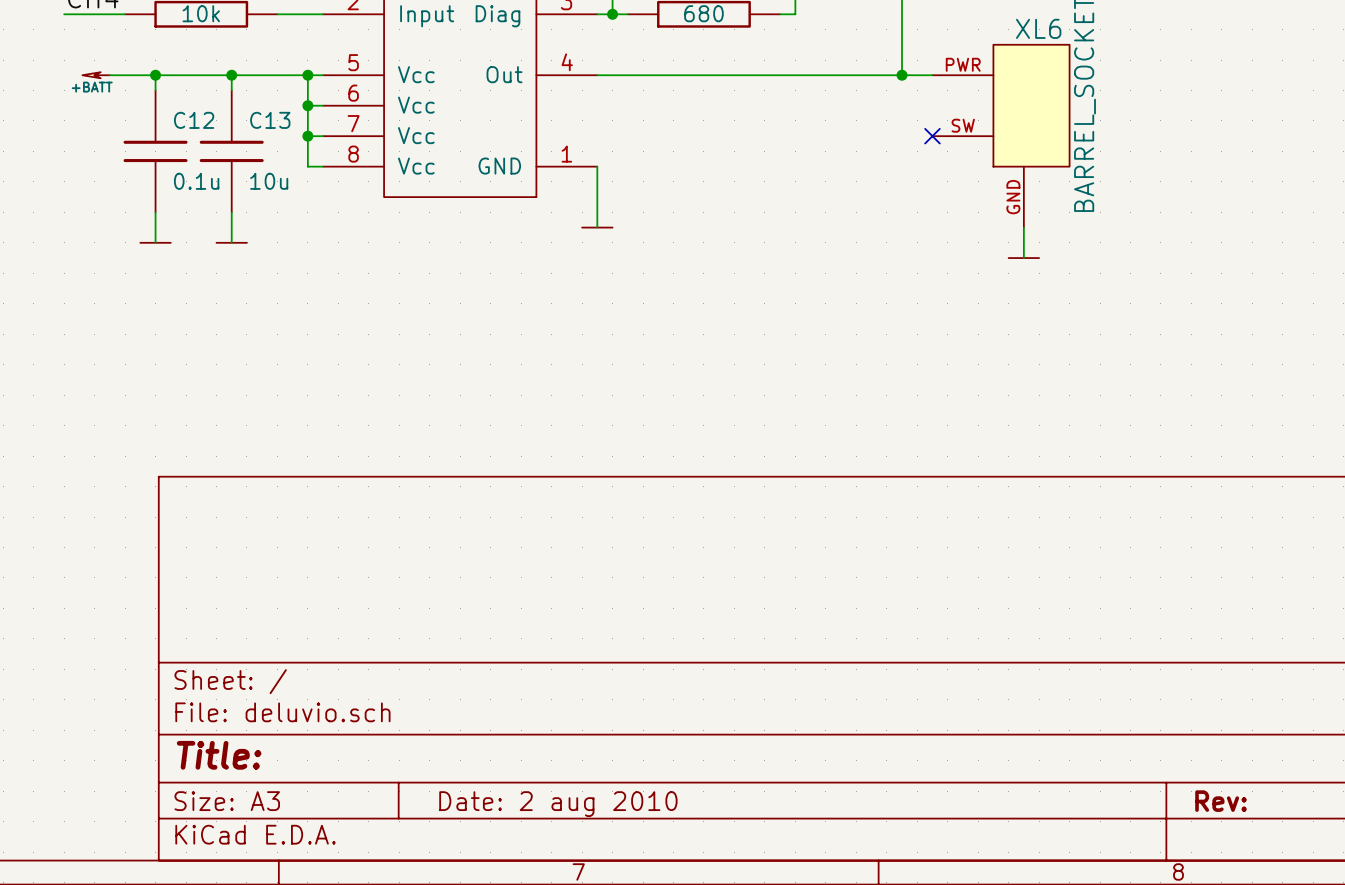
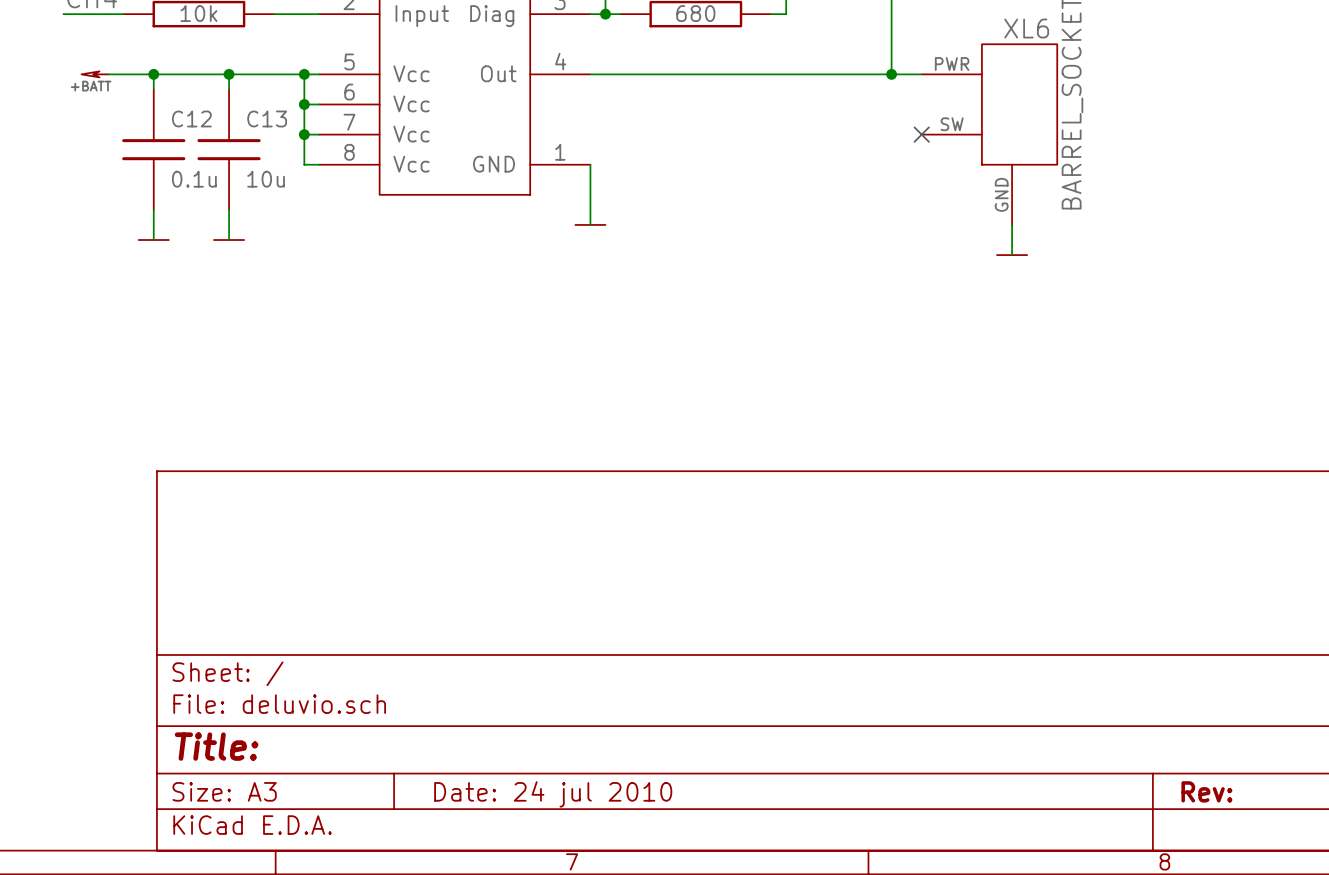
title block: Date: 2 aug 2010 (558, 804) -> Date: 24 jul 2010 (553, 794)

